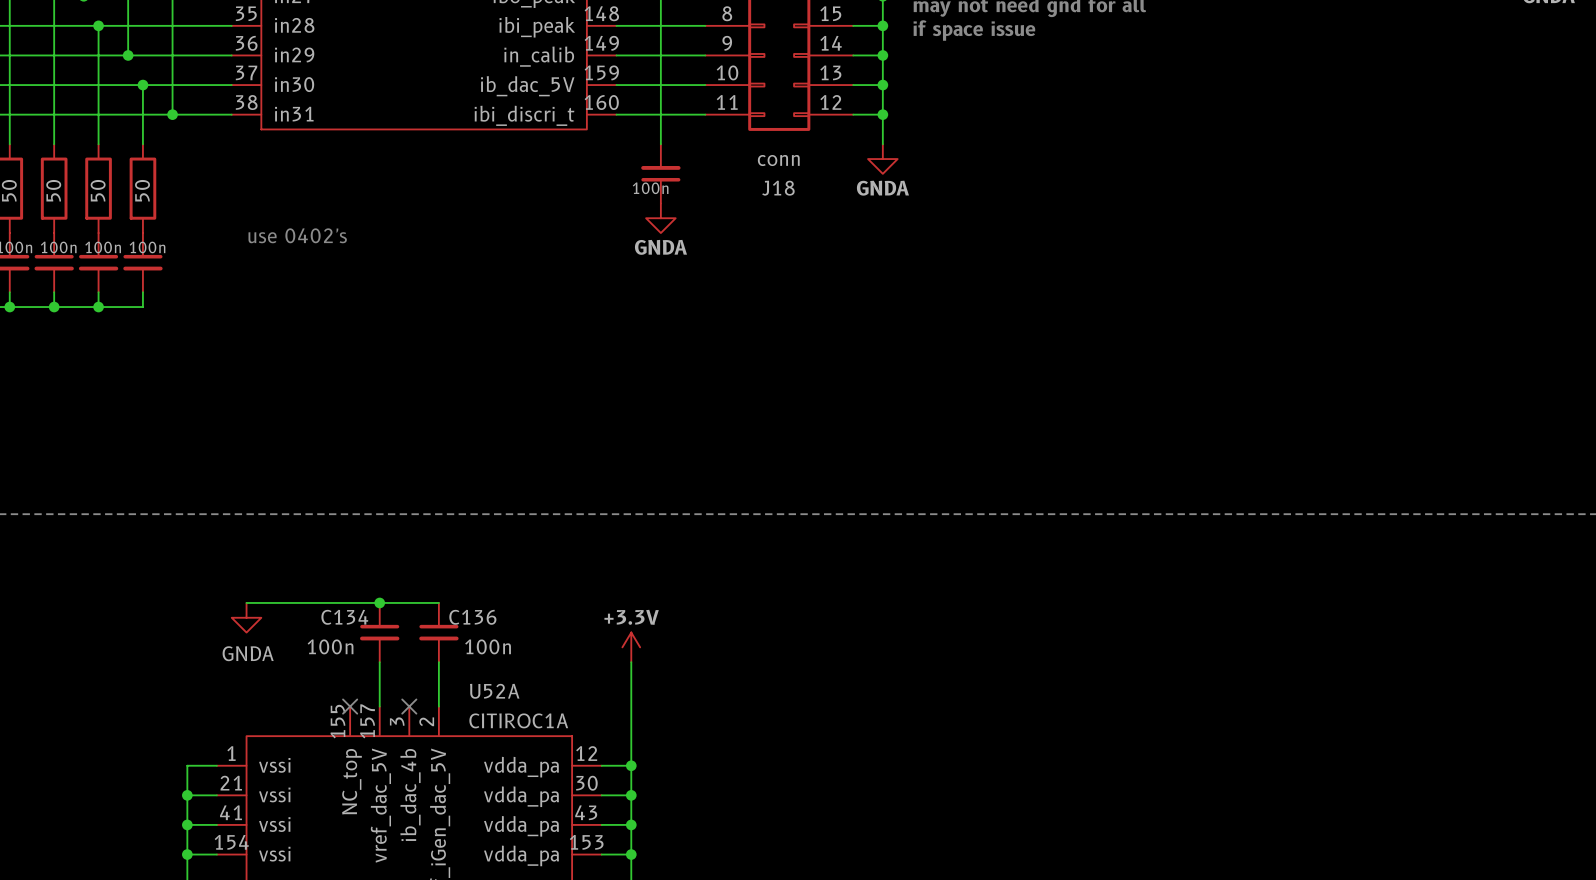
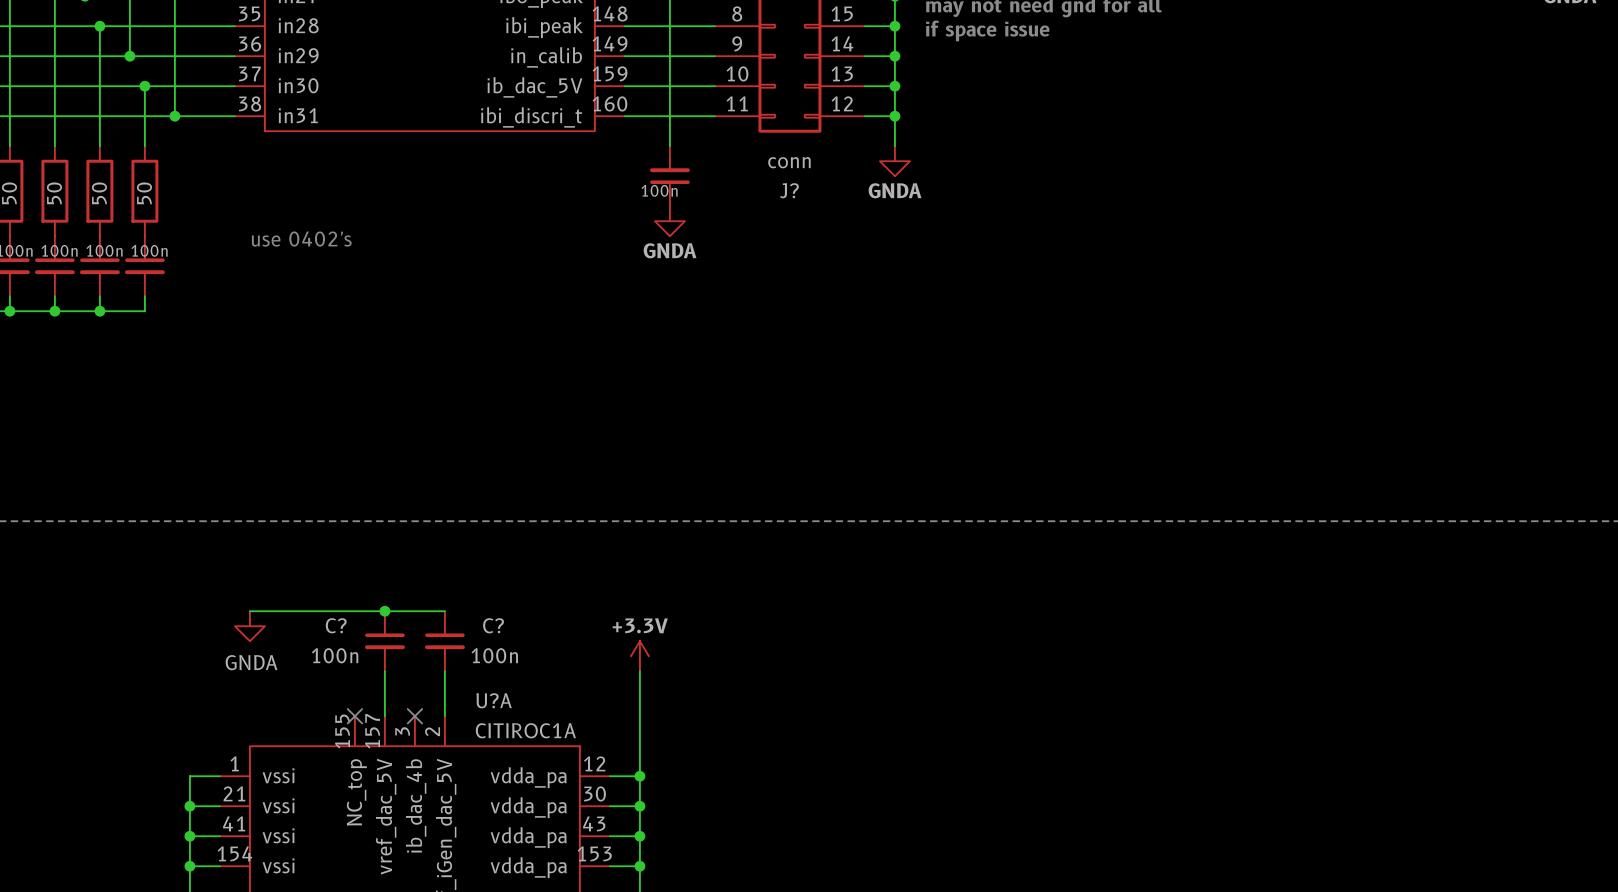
J18 name: J18 (778, 188) -> J? (789, 190)
C134 name: C134 (344, 617) -> C? (336, 625)
C136 name: C136 (472, 617) -> C? (493, 625)
U52A name: U52A (494, 691) -> U?A (494, 700)

